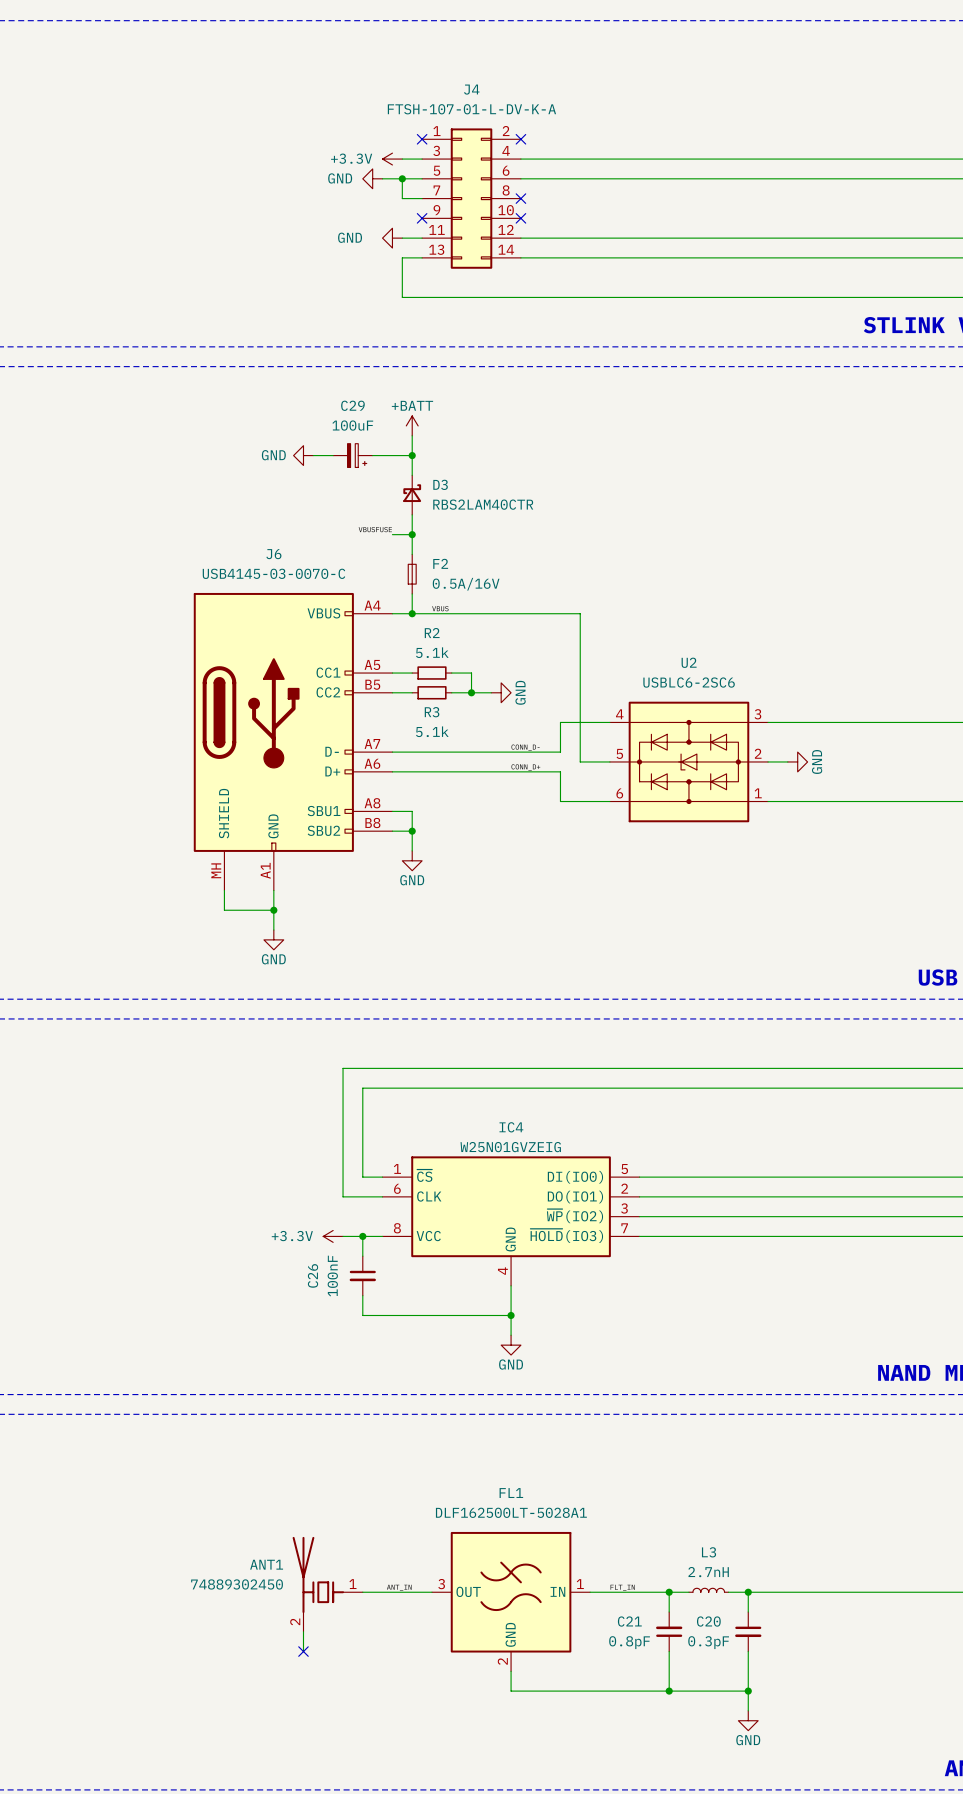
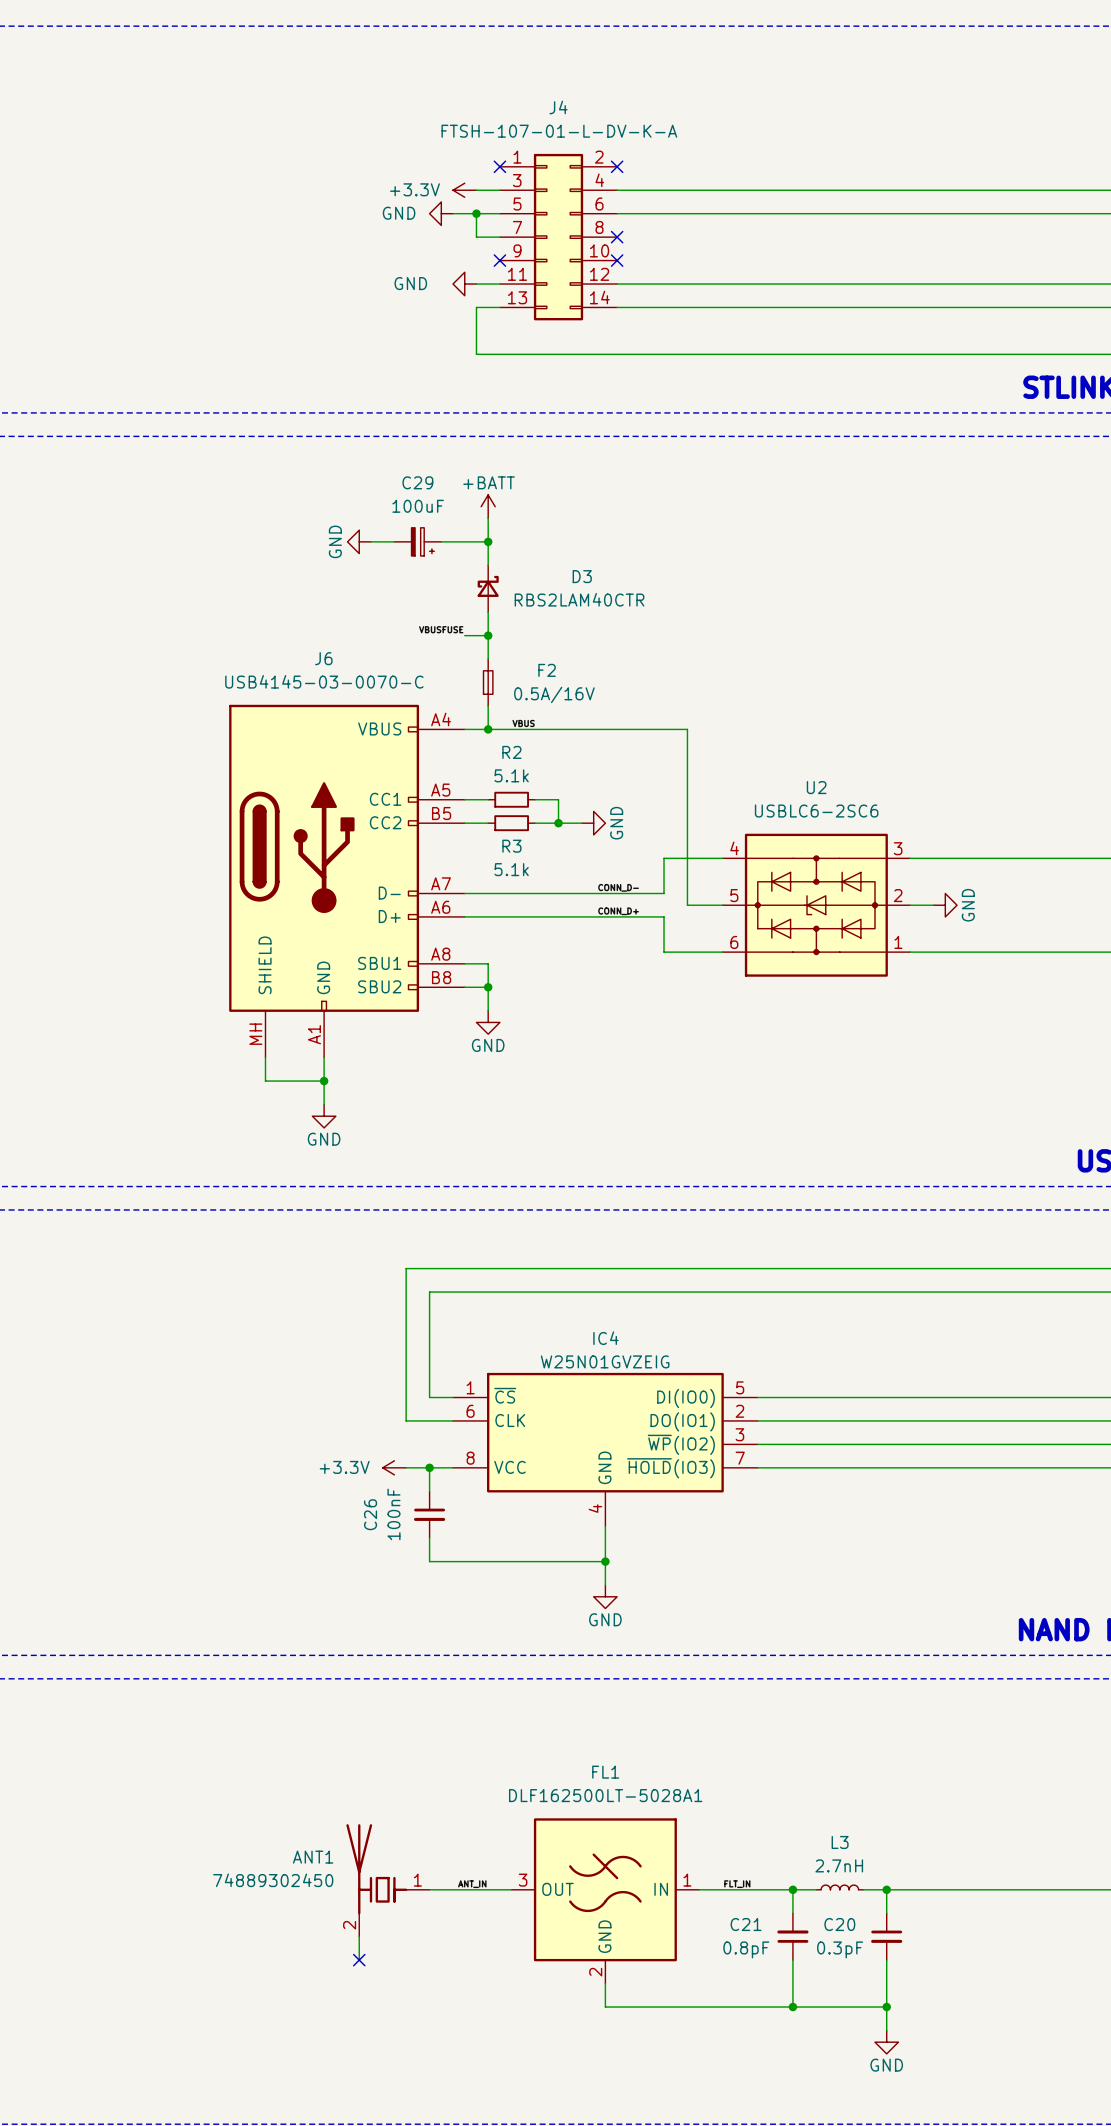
power symbol text rotation: 0° (273, 455) -> 90° counterclockwise (335, 541)
D3 name position: D3 (440, 484) -> D3 (582, 576)
F2 name position: F2 (440, 563) -> F2 (547, 670)

